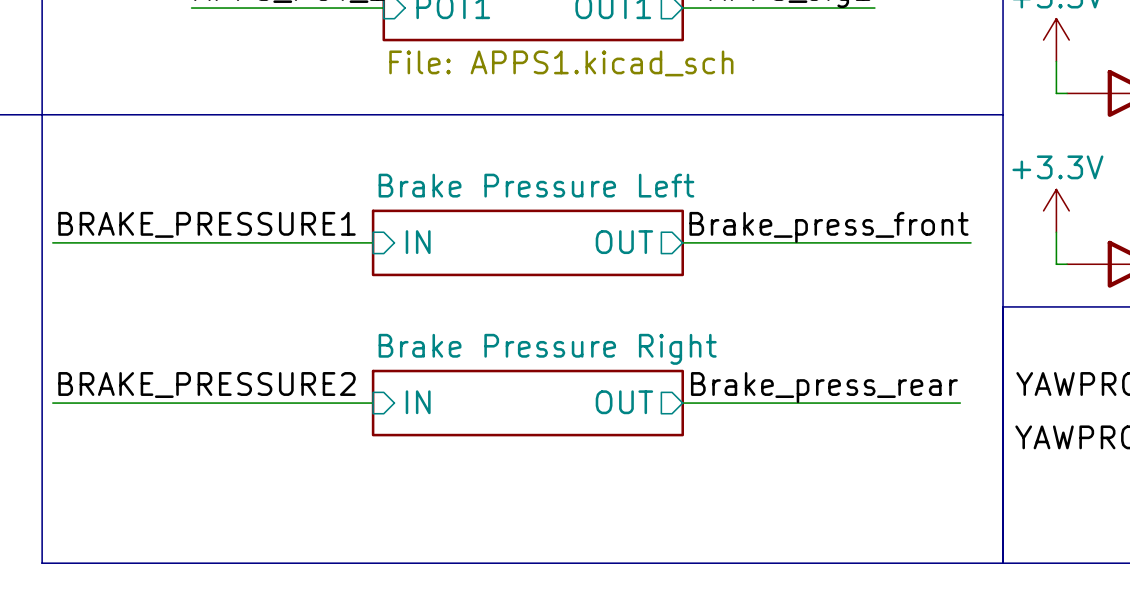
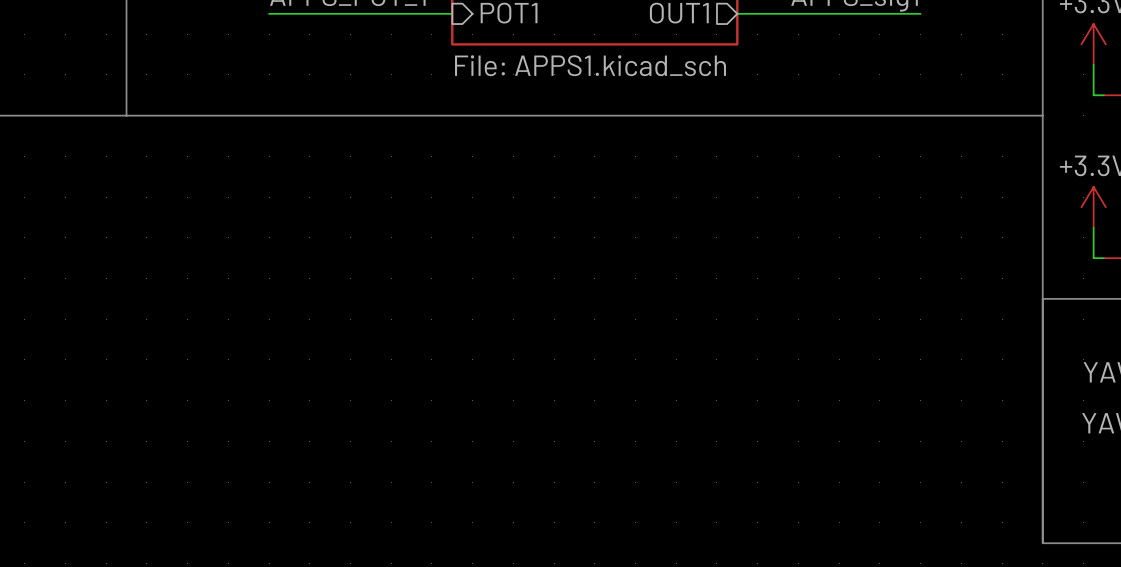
line: (42, 114) (42, 563) (1003, 563) -> none
label: BRAKE_PRESSURE1 (207, 224) -> none
label: Brake_press_front (828, 227) -> none
wire: (52, 242) (373, 242) -> none
sheet pin: IN (418, 242) -> none
sheet Brake Pressure Left: (527, 242) -> none
sheet pin: OUT (624, 242) -> none
wire: (682, 242) (970, 242) -> none
label: BRAKE_PRESSURE2 (207, 385) -> none
label: Brake_press_rear (824, 387) -> none
sheet pin: IN (418, 402) -> none
sheet pin: OUT (624, 402) -> none
wire: (52, 403) (373, 403) -> none
sheet Brake Pressure Right: (527, 403) -> none
wire: (682, 403) (960, 403) -> none

